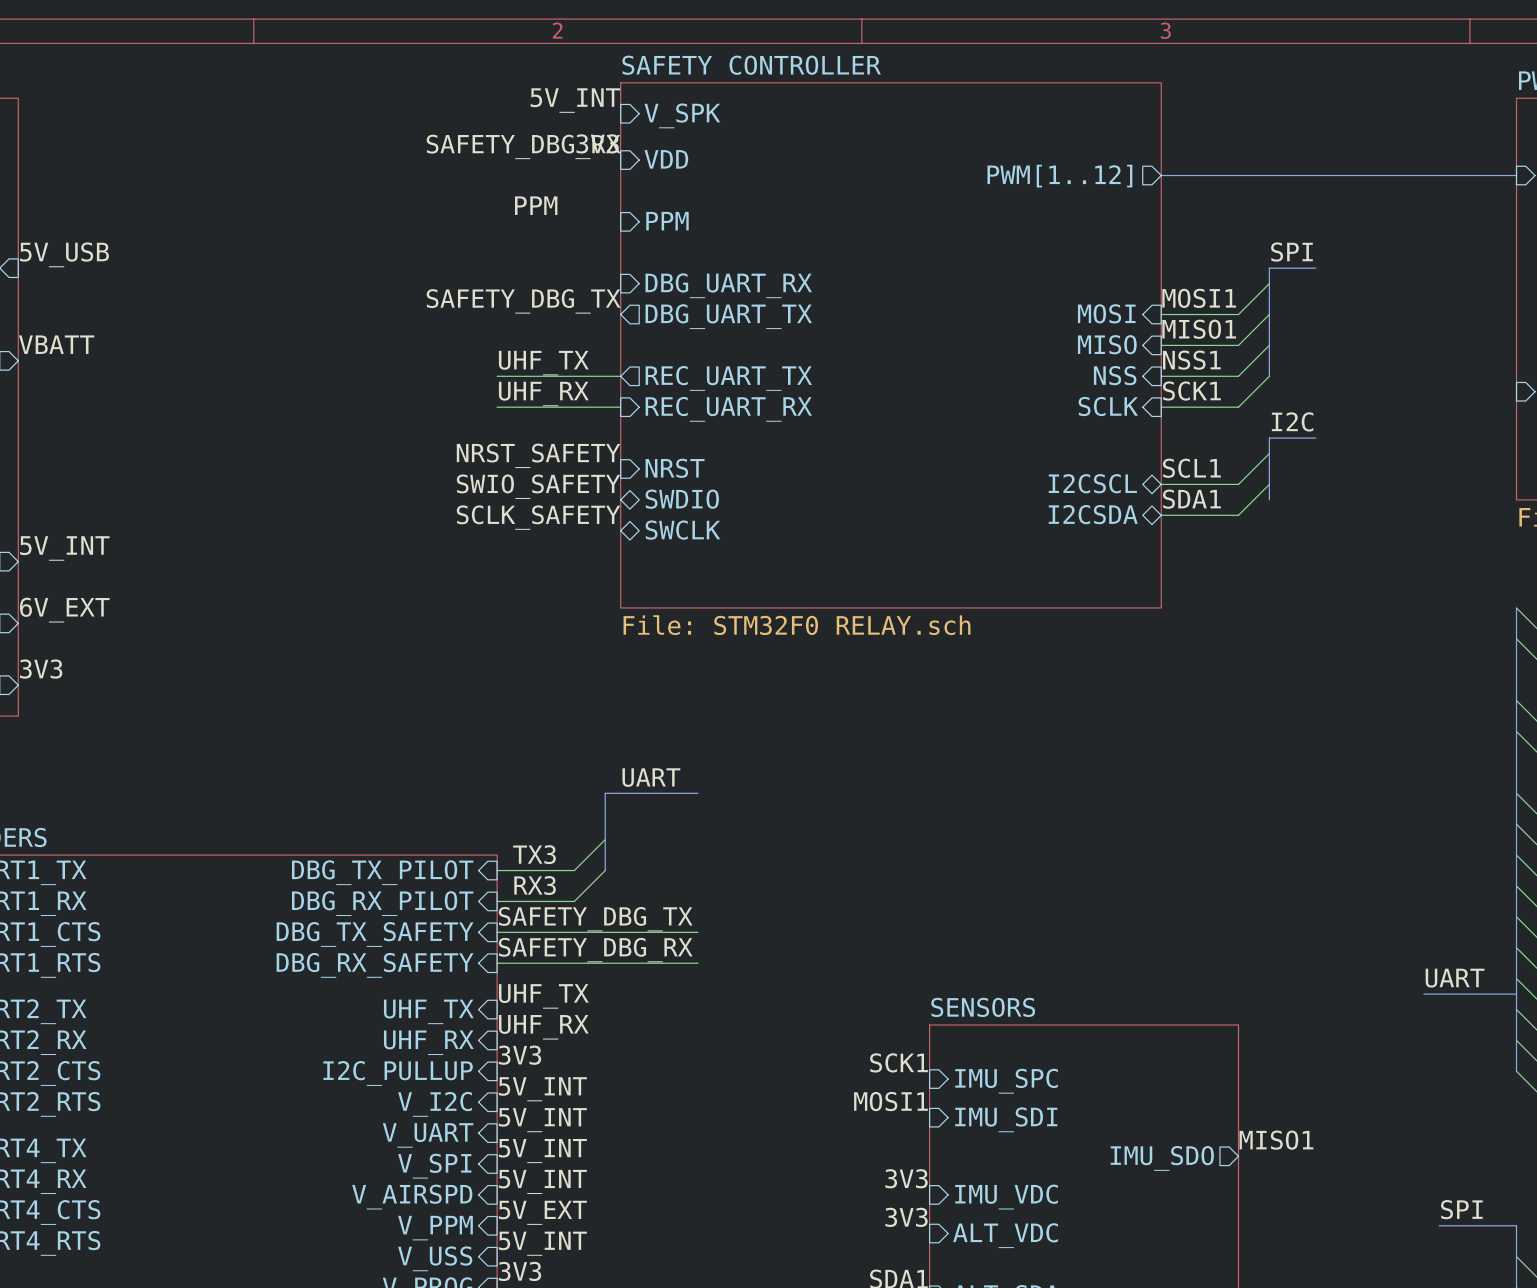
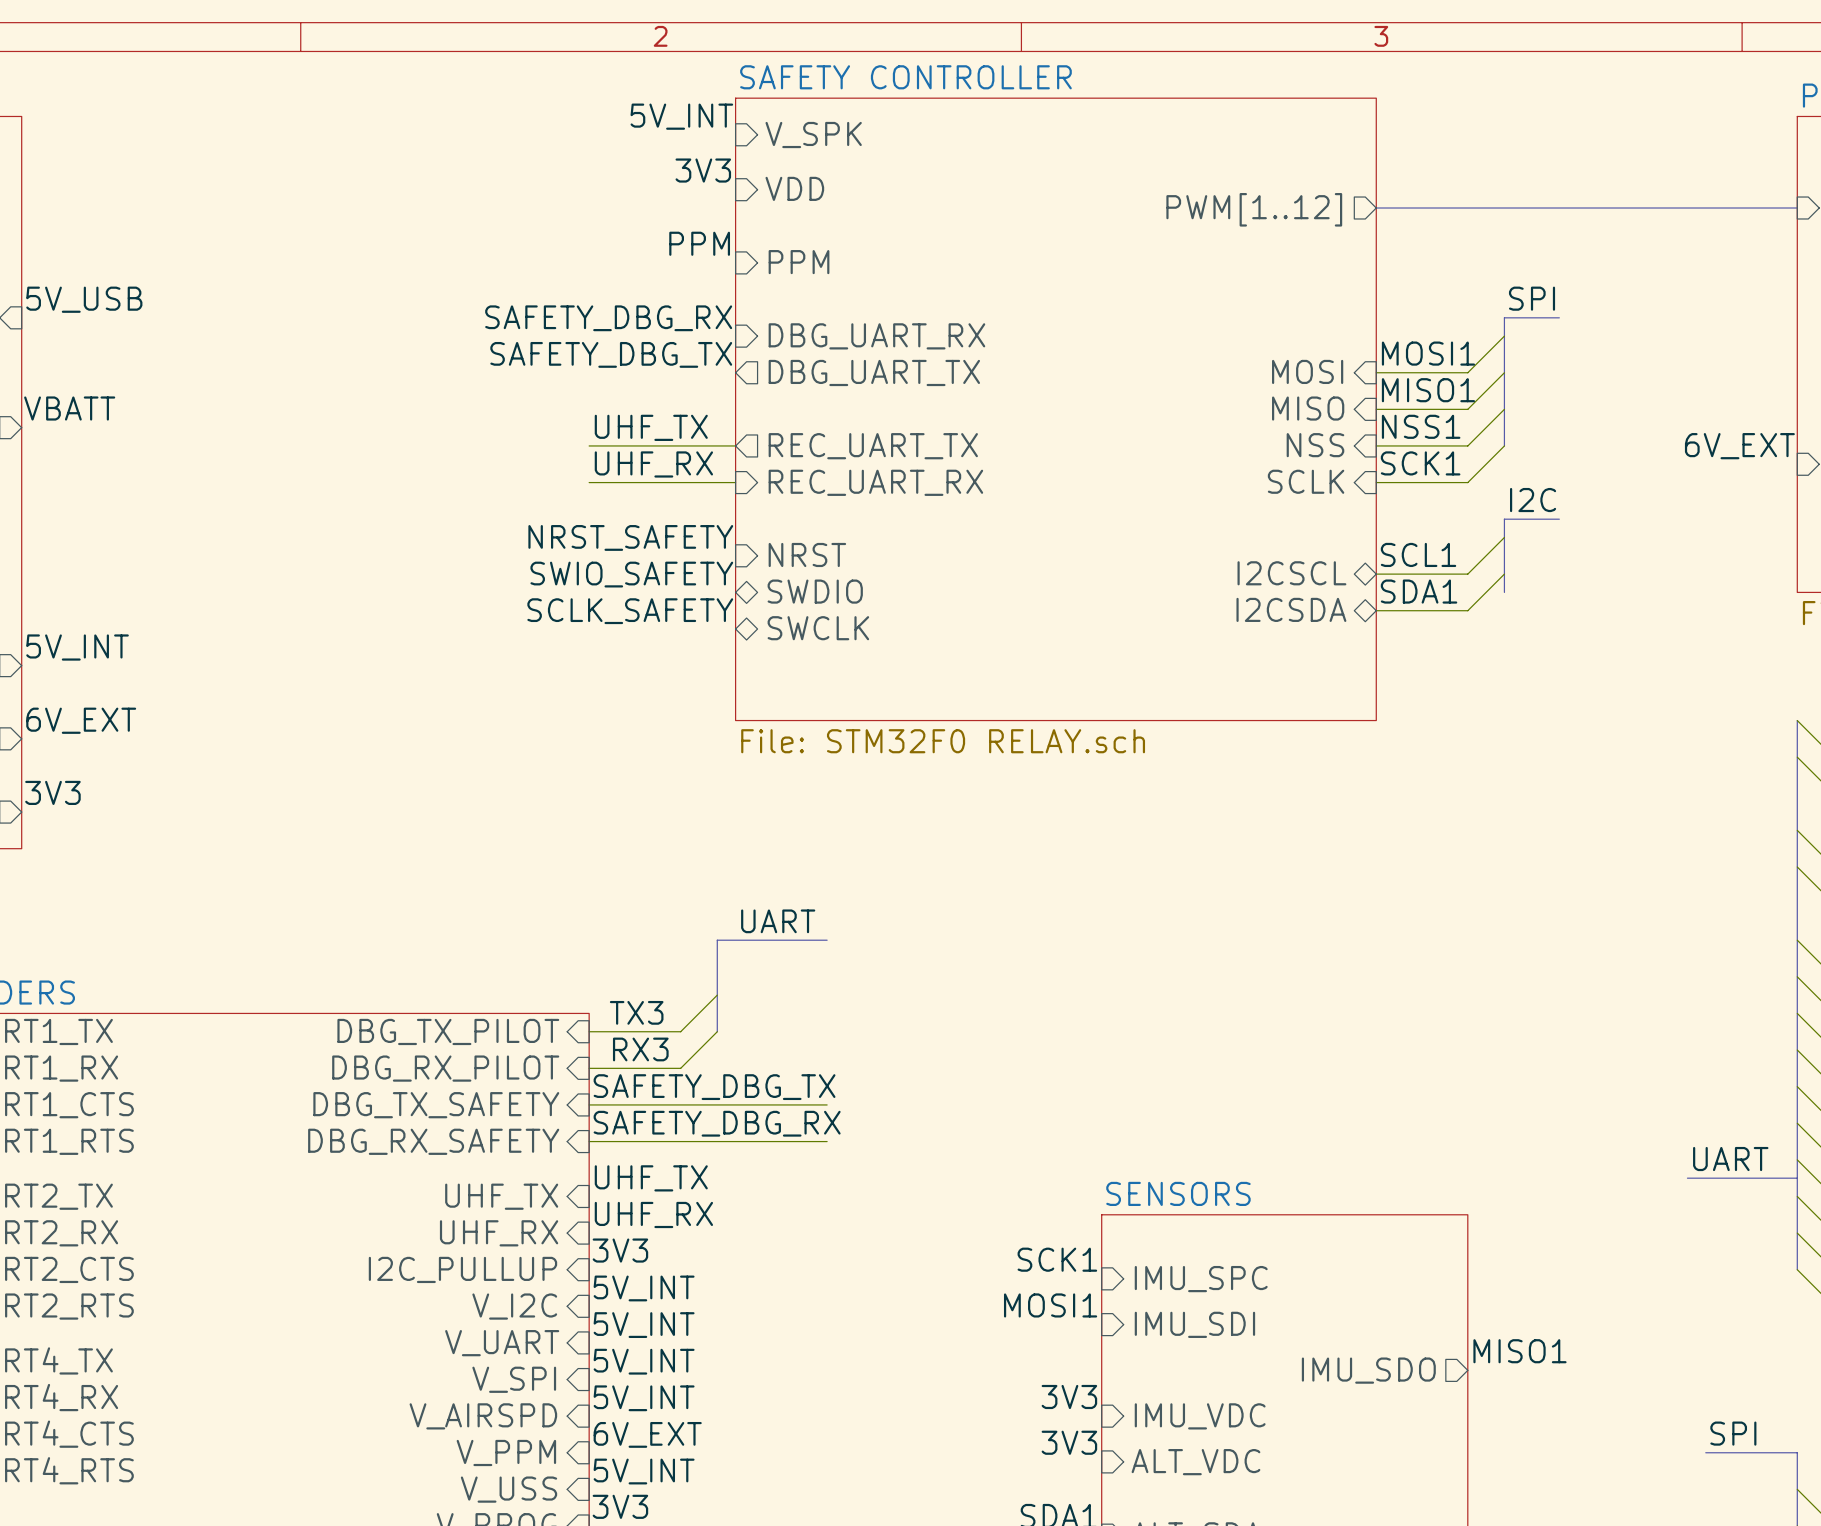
label position: SAFETY_DBG_RX (523, 146) -> SAFETY_DBG_RX (608, 318)
label position: PPM (536, 205) -> PPM (699, 243)
label: none -> 6V_EXT (1739, 446)
label: 5V_EXT (542, 1212) -> 6V_EXT (647, 1434)

